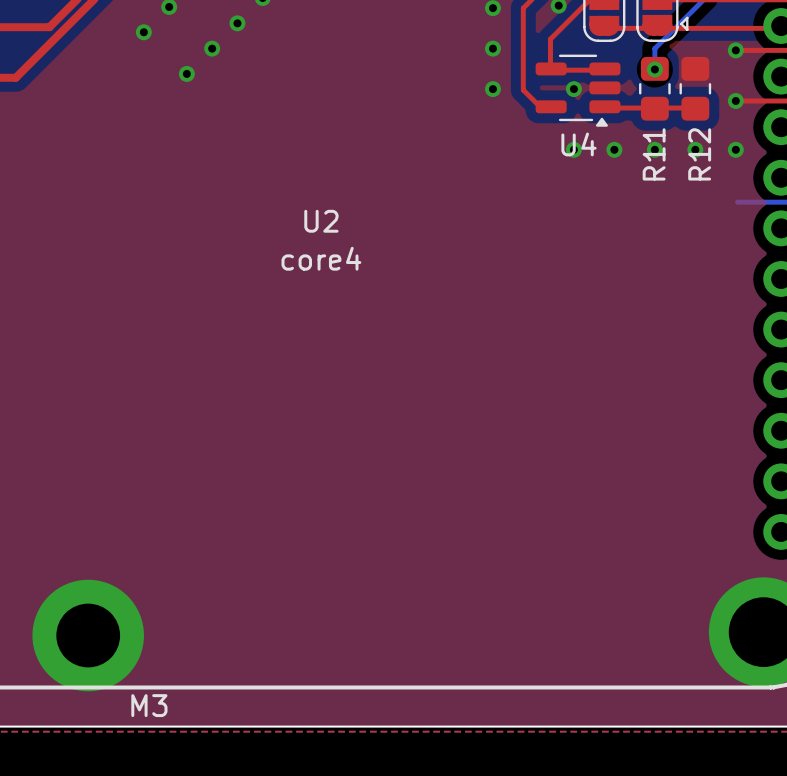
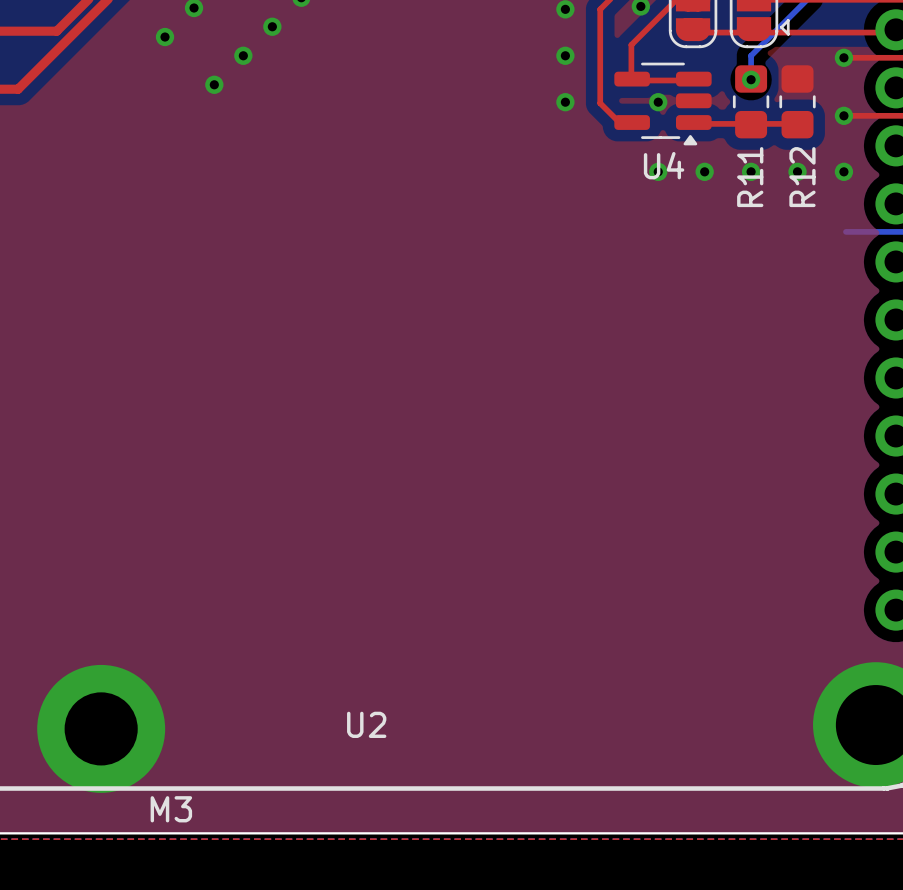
U2 name position: U2 (321, 221) -> U2 (366, 724)
U2 value: core4 (321, 258) -> none

